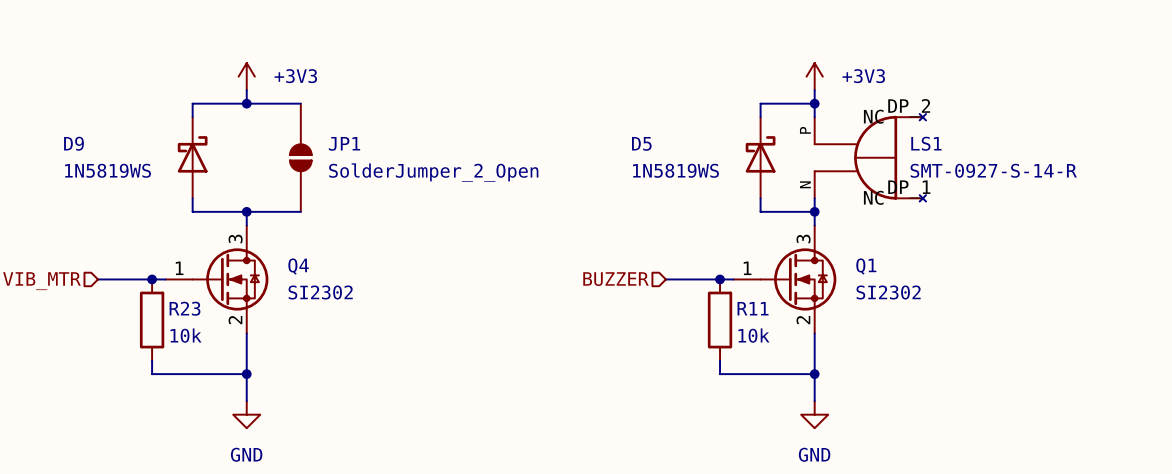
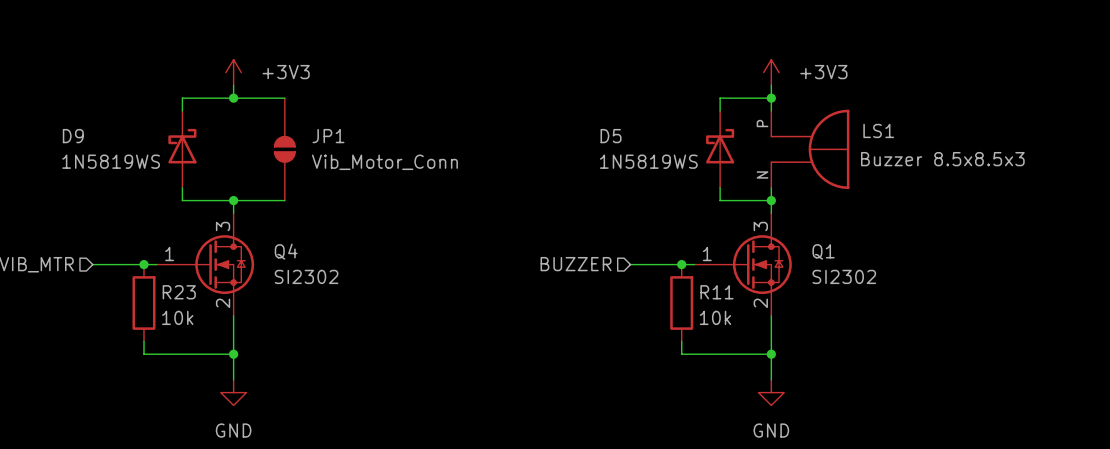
LS1 symbol: [813, 114, 927, 202] -> [770, 109, 850, 190]
LS1 value: SMT-0927-S-14-R (993, 170) -> Buzzer 8.5x8.5x3 (942, 159)
JP1 value: SolderJumper_2_Open (433, 172) -> Vib_Motor_Conn (384, 162)

